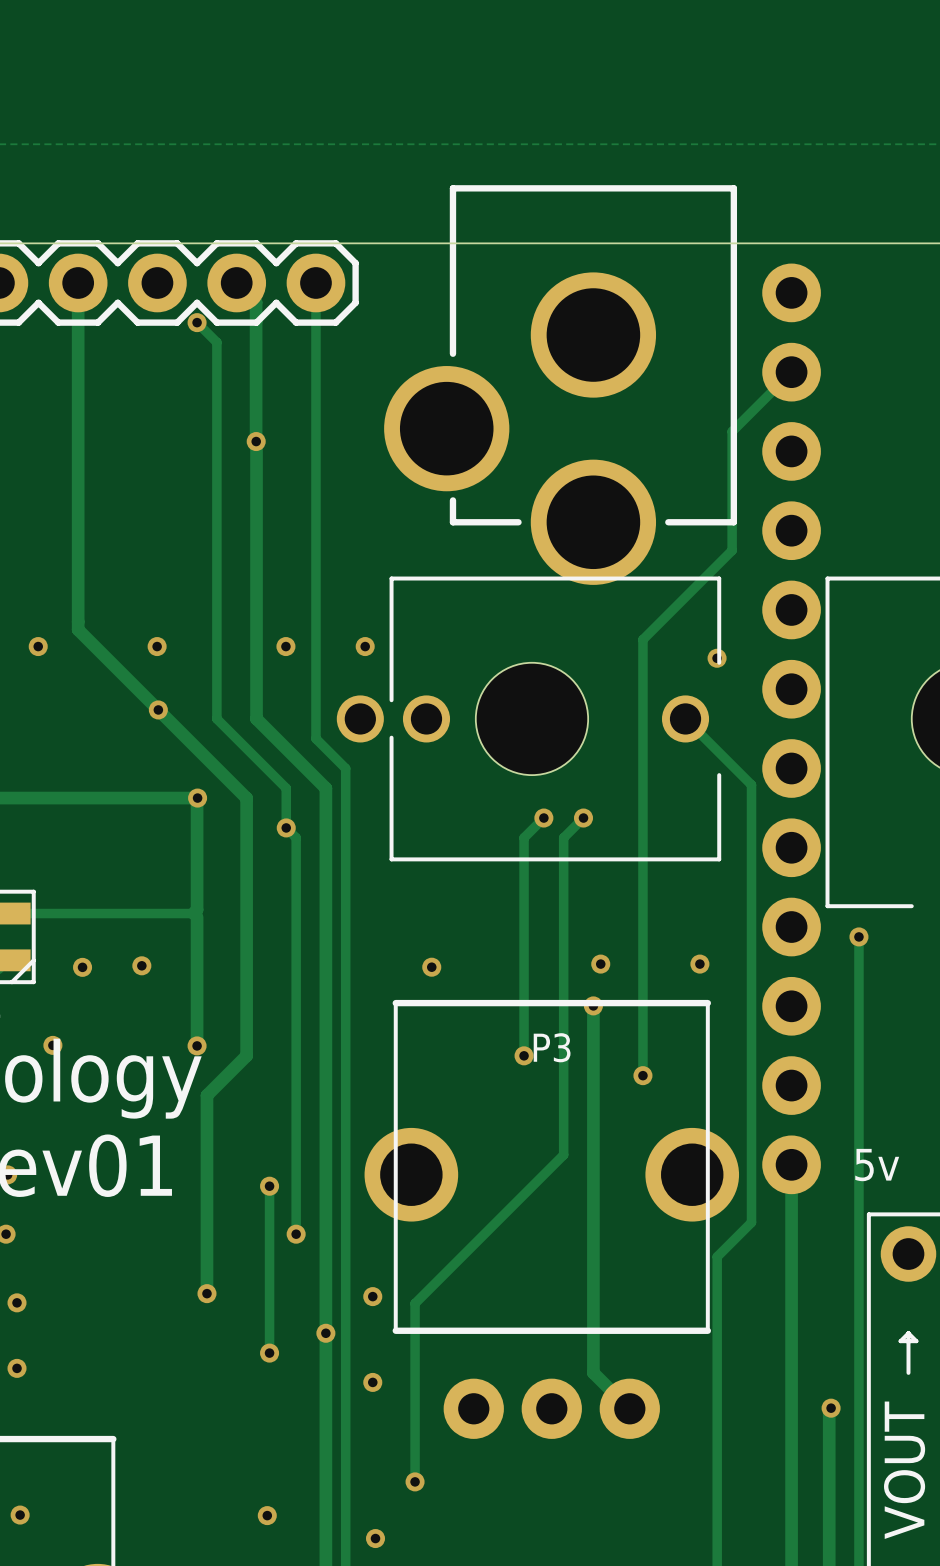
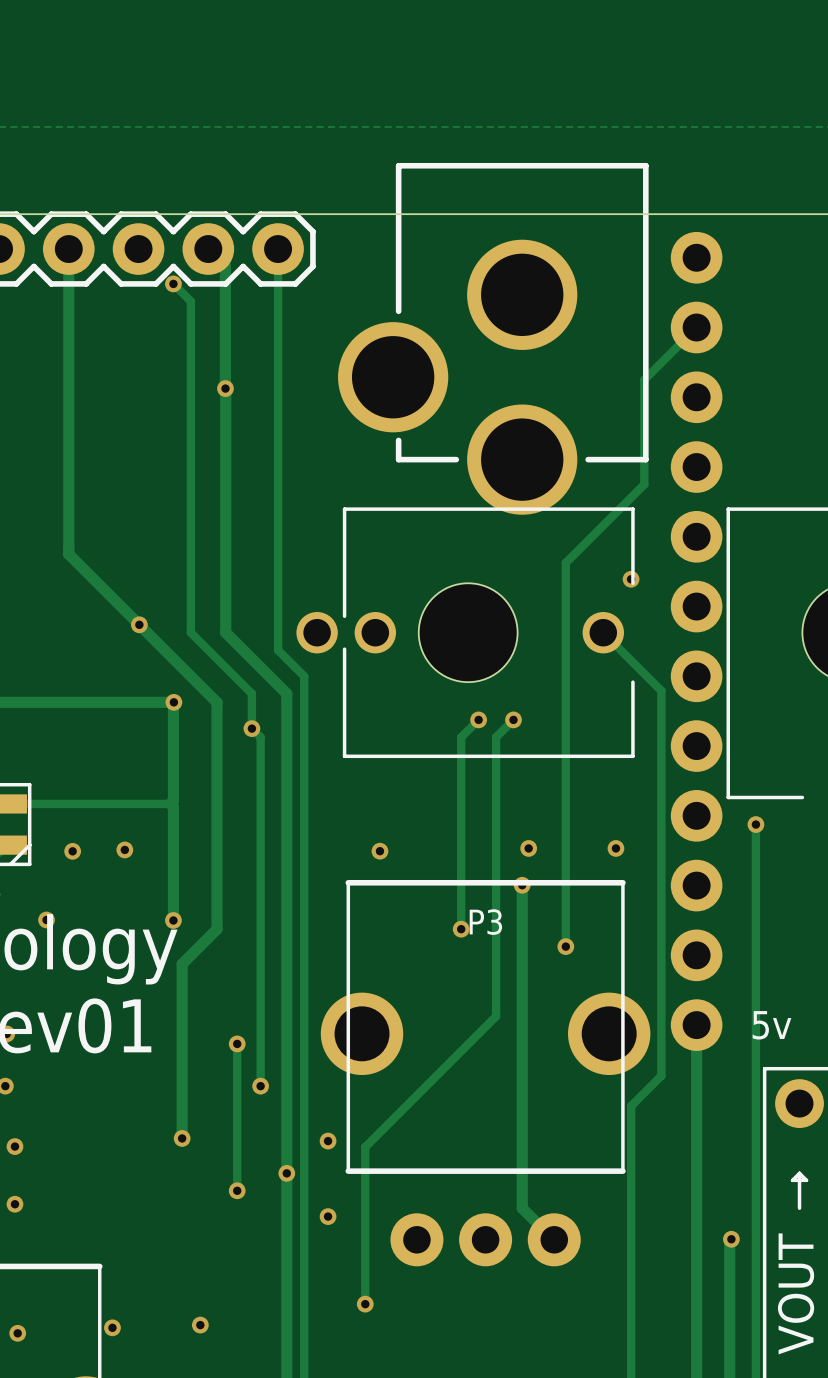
via: (38, 646) -> none
via: (157, 646) -> none
via: (285, 646) -> none
via: (365, 646) -> none
via: none -> (112, 1327)
via position: (267, 1515) -> (200, 1325)
via: (375, 1538) -> none

